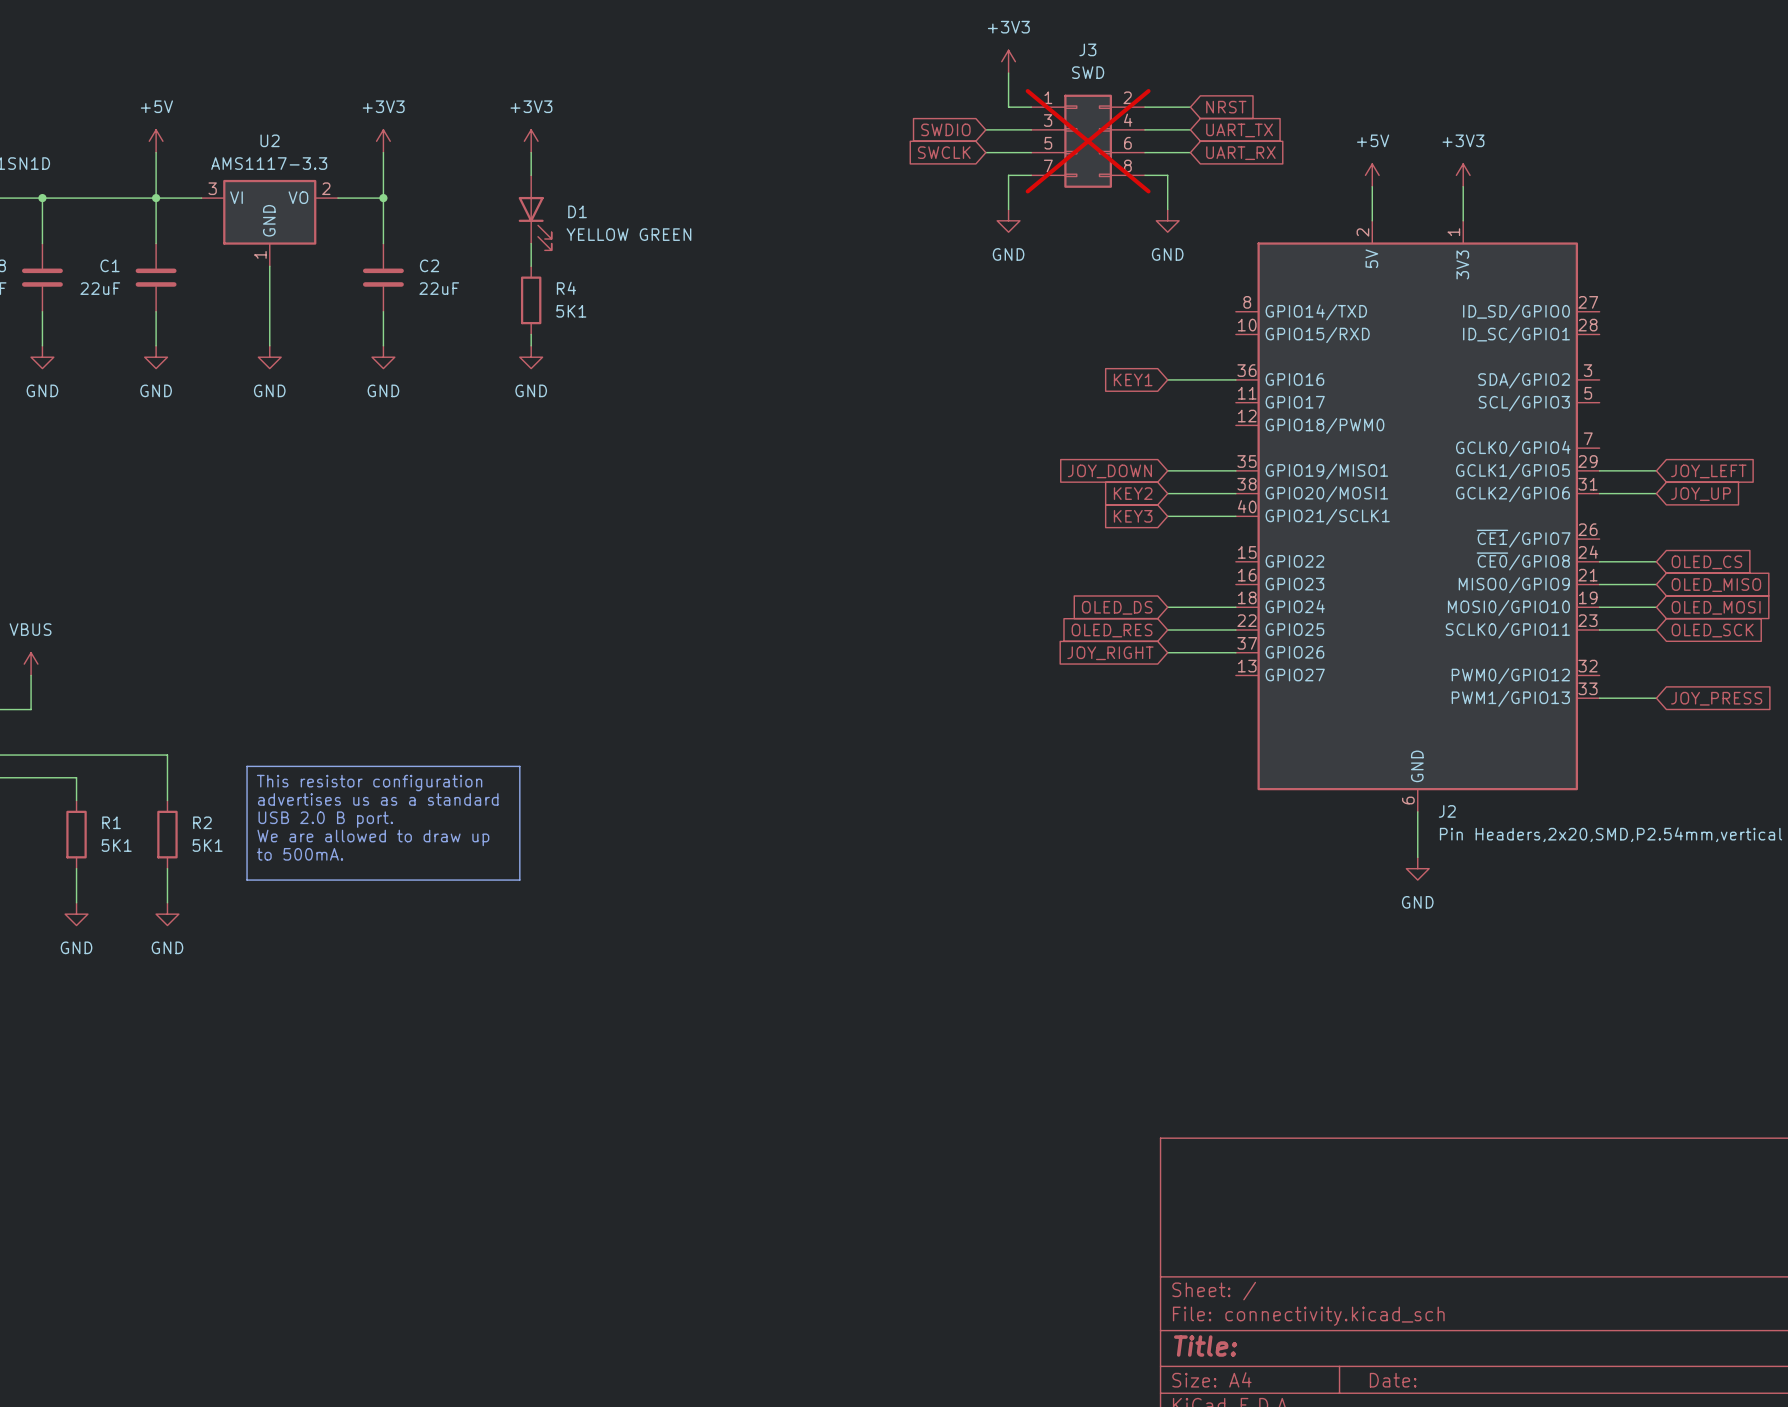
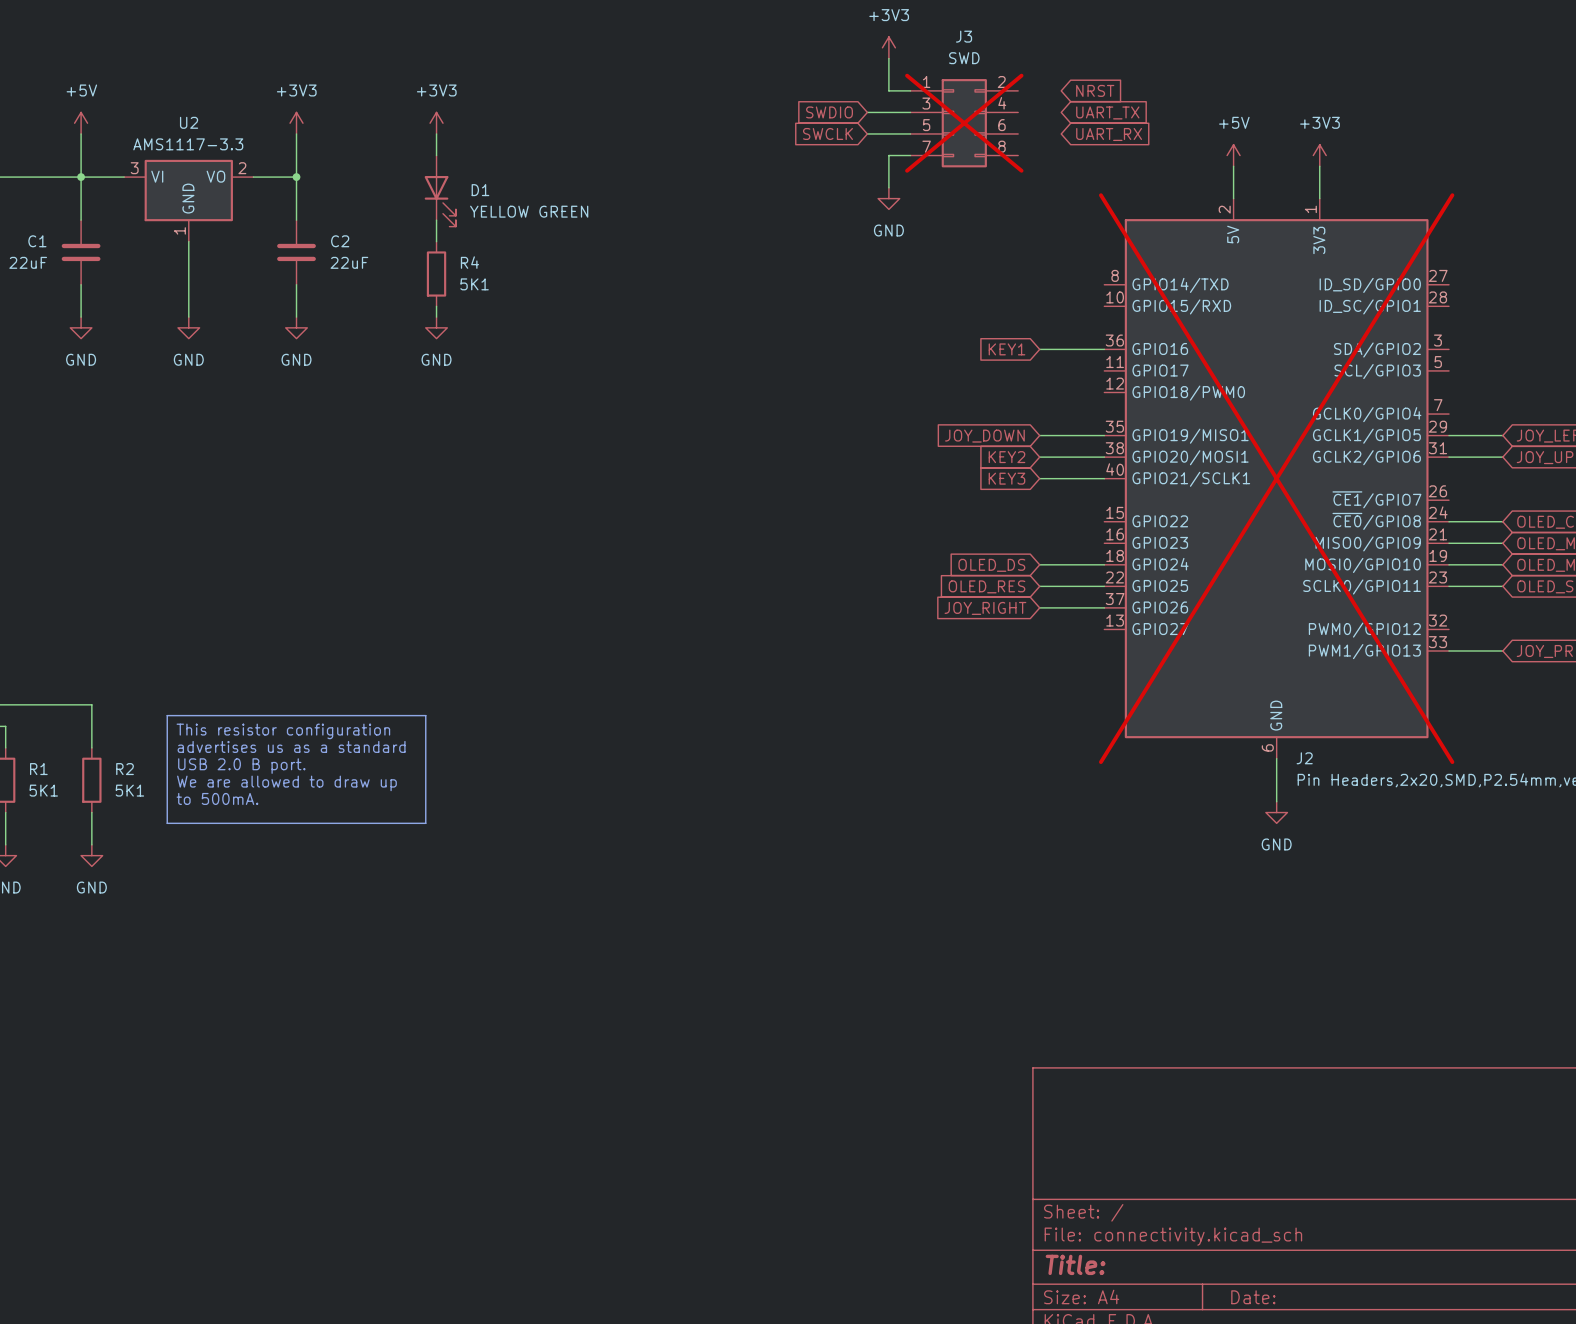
wire: (1144, 107) (1190, 107) -> none
wire: (1144, 129) (1190, 129) -> none
wire: (1144, 152) (1190, 152) -> none
wire: (1144, 175) (1167, 175) (1167, 209) -> none
power symbol: GND (1167, 220) -> none
J2 do-not-place cross: none -> (1276, 478)

